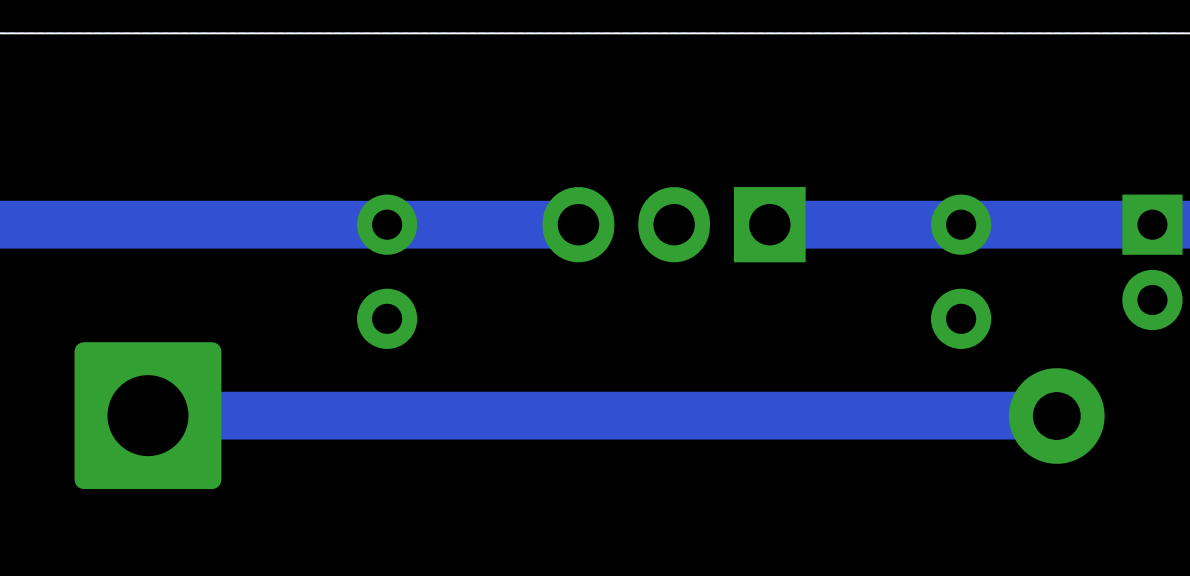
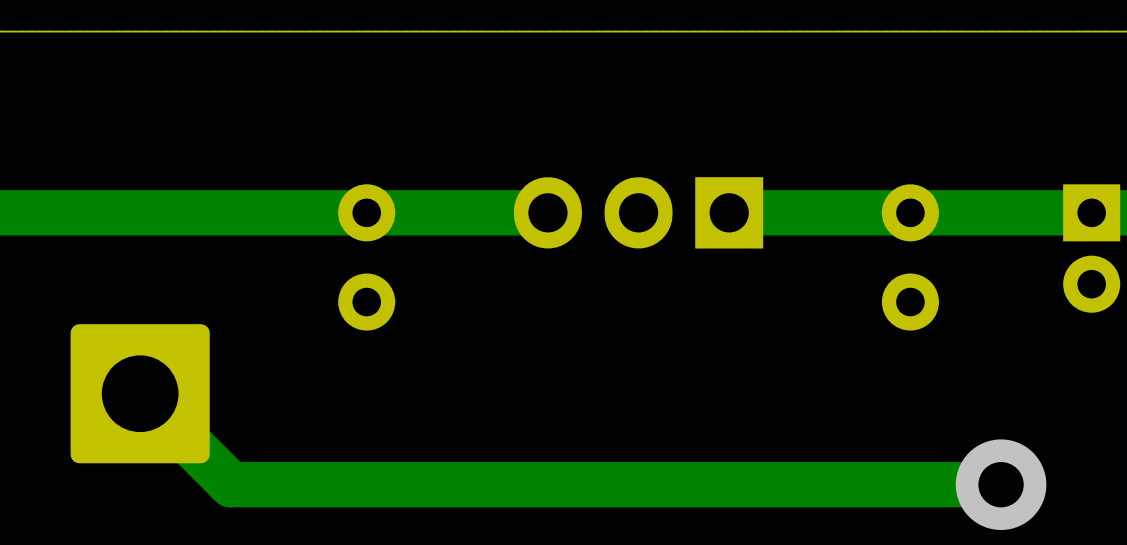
track: (1056, 415) (147, 415) -> (1001, 484) (231, 484) (140, 393)
via position: (1056, 416) -> (1001, 484)

